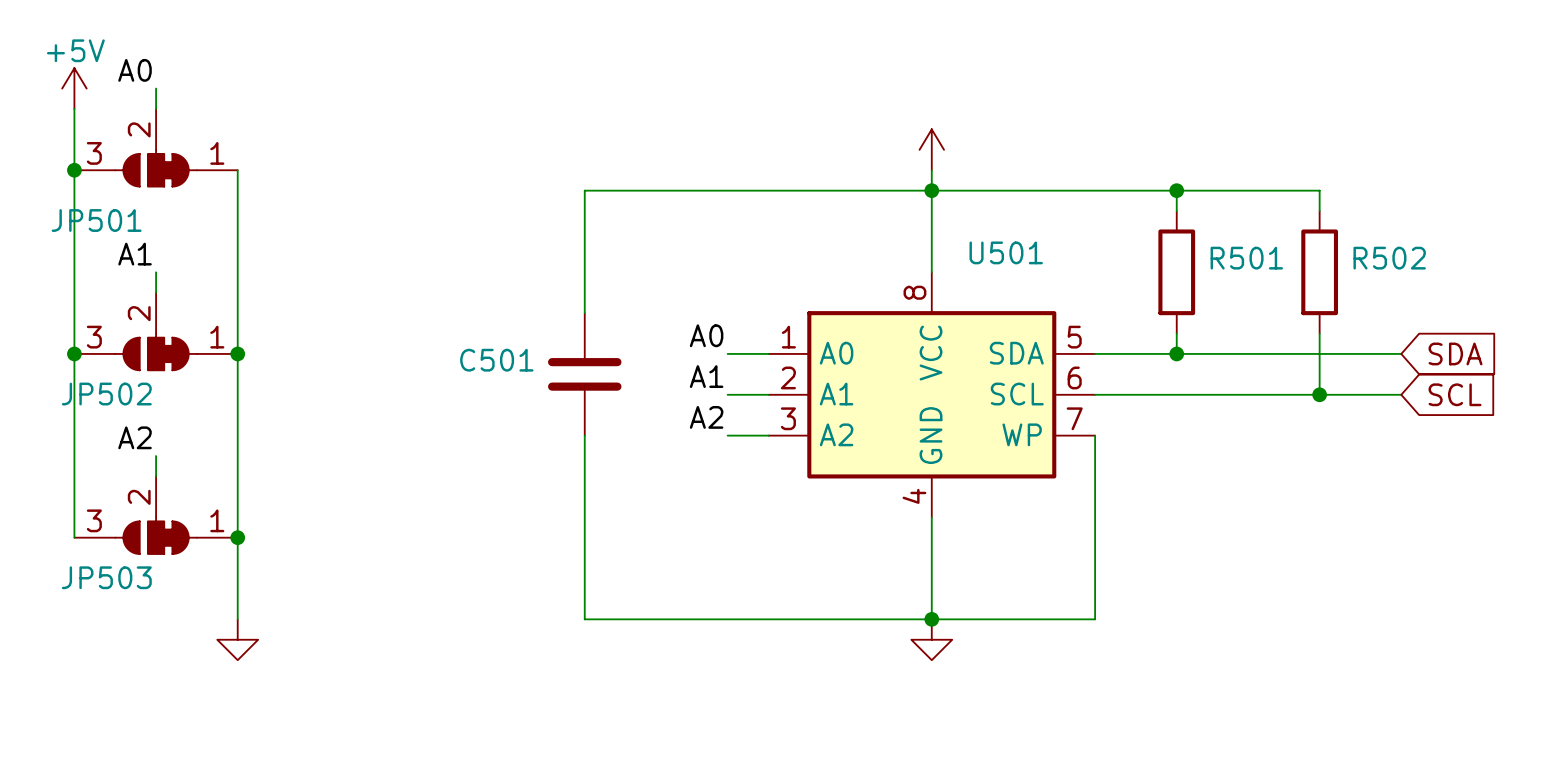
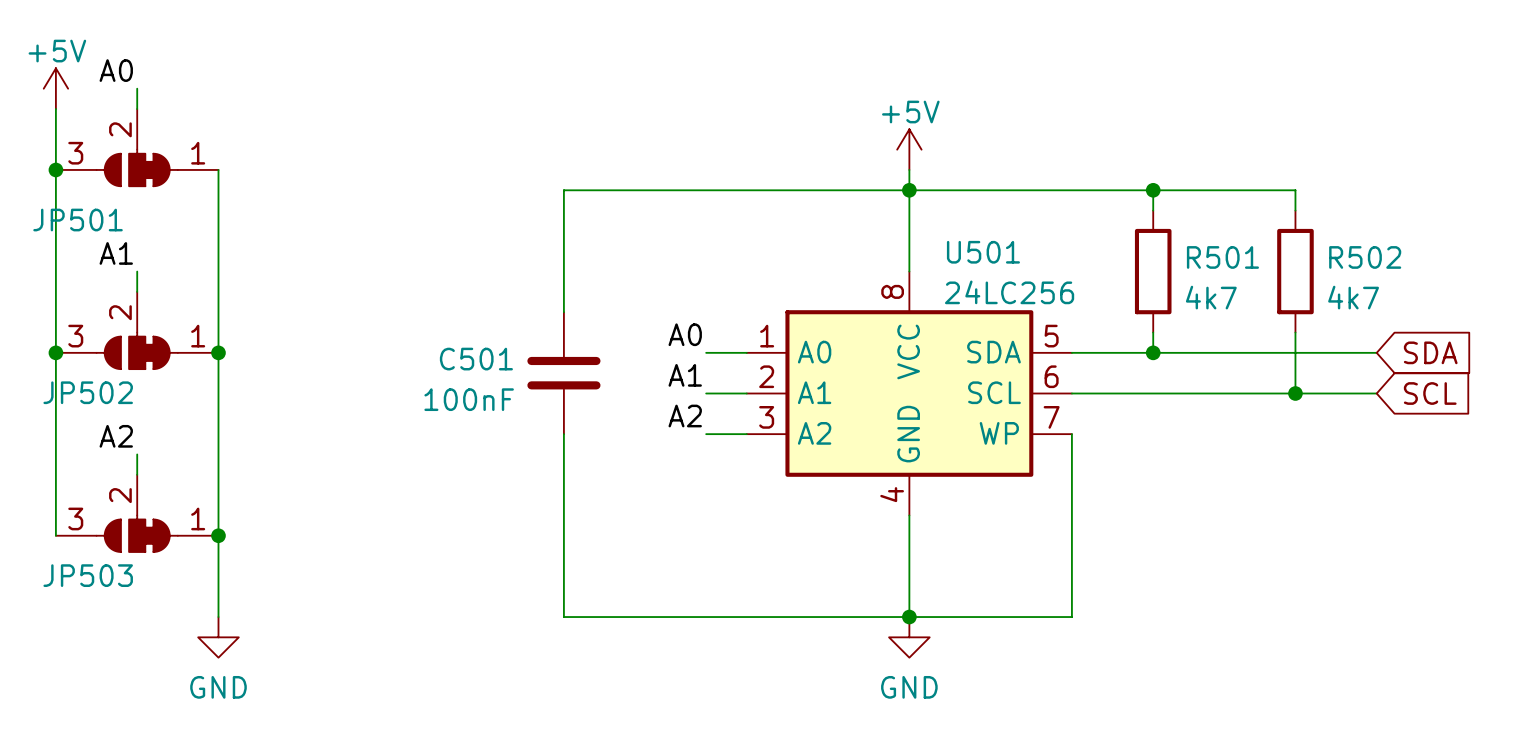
power symbol text: none -> +5V (910, 112)
U501 value: none -> 24LC256 (1009, 292)
R501 value: none -> 4k7 (1211, 297)
R502 value: none -> 4k7 (1353, 297)
C501 value: none -> 100nF (469, 399)
power symbol text: none -> GND (218, 687)
power symbol text: none -> GND (909, 687)

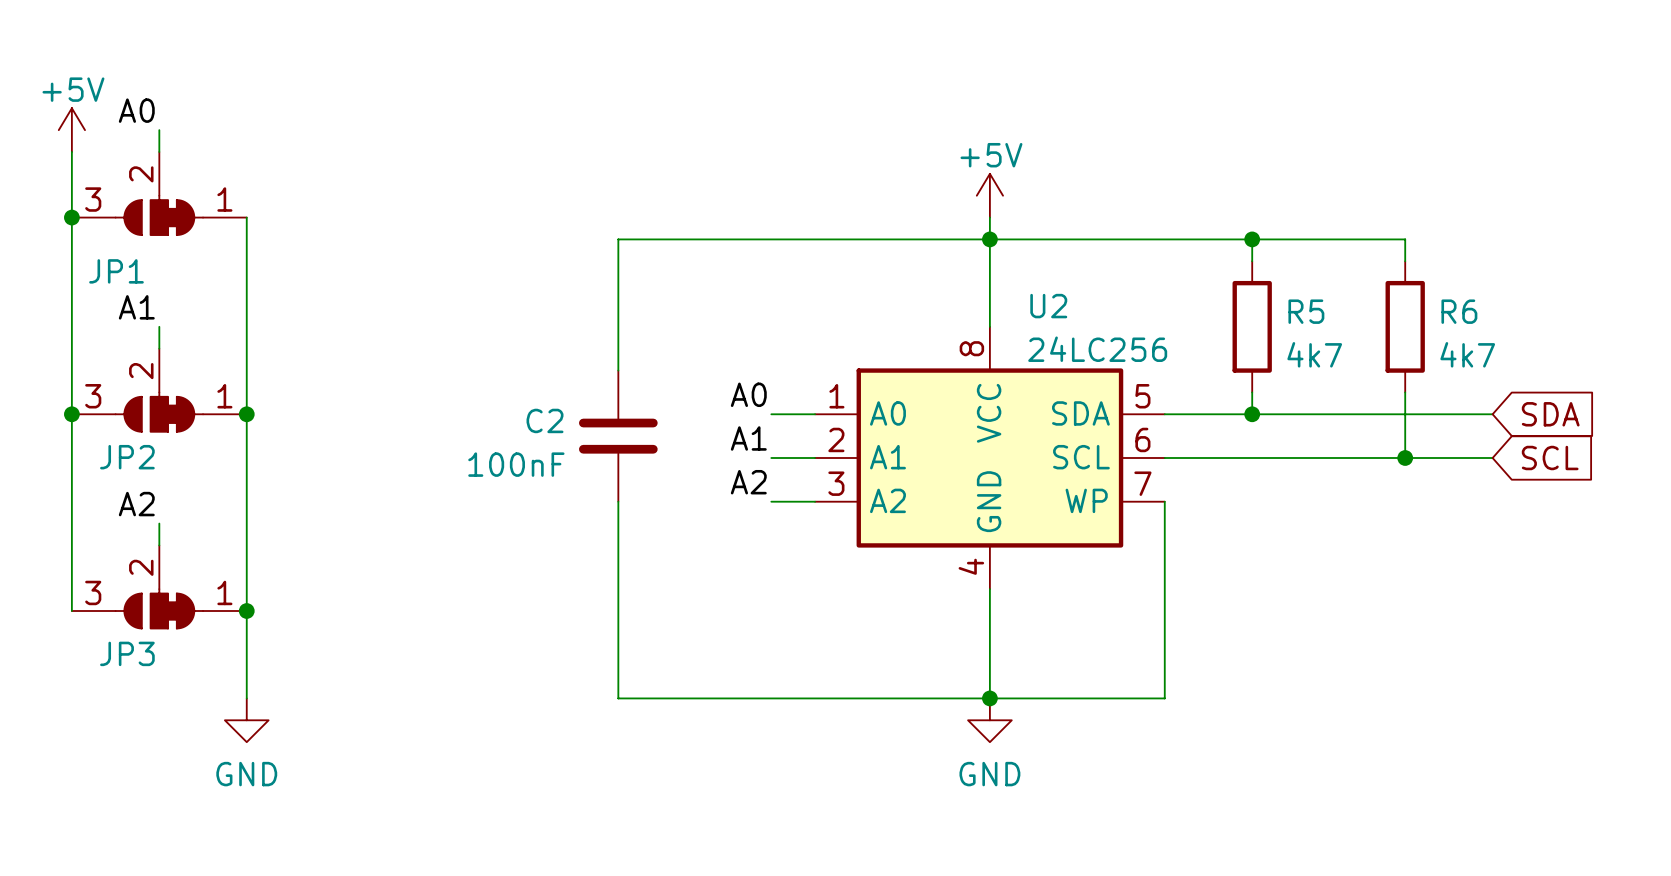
JP501 name: JP501 (78, 220) -> JP1 (116, 271)
U501 name: U501 (983, 252) -> U2 (1048, 306)
R501 name: R501 (1222, 257) -> R5 (1306, 311)
R502 name: R502 (1365, 257) -> R6 (1459, 311)
C501 name: C501 (476, 359) -> C2 (545, 420)
JP502 name: JP502 (88, 392) -> JP2 (127, 457)
JP503 name: JP503 (88, 575) -> JP3 (127, 653)

